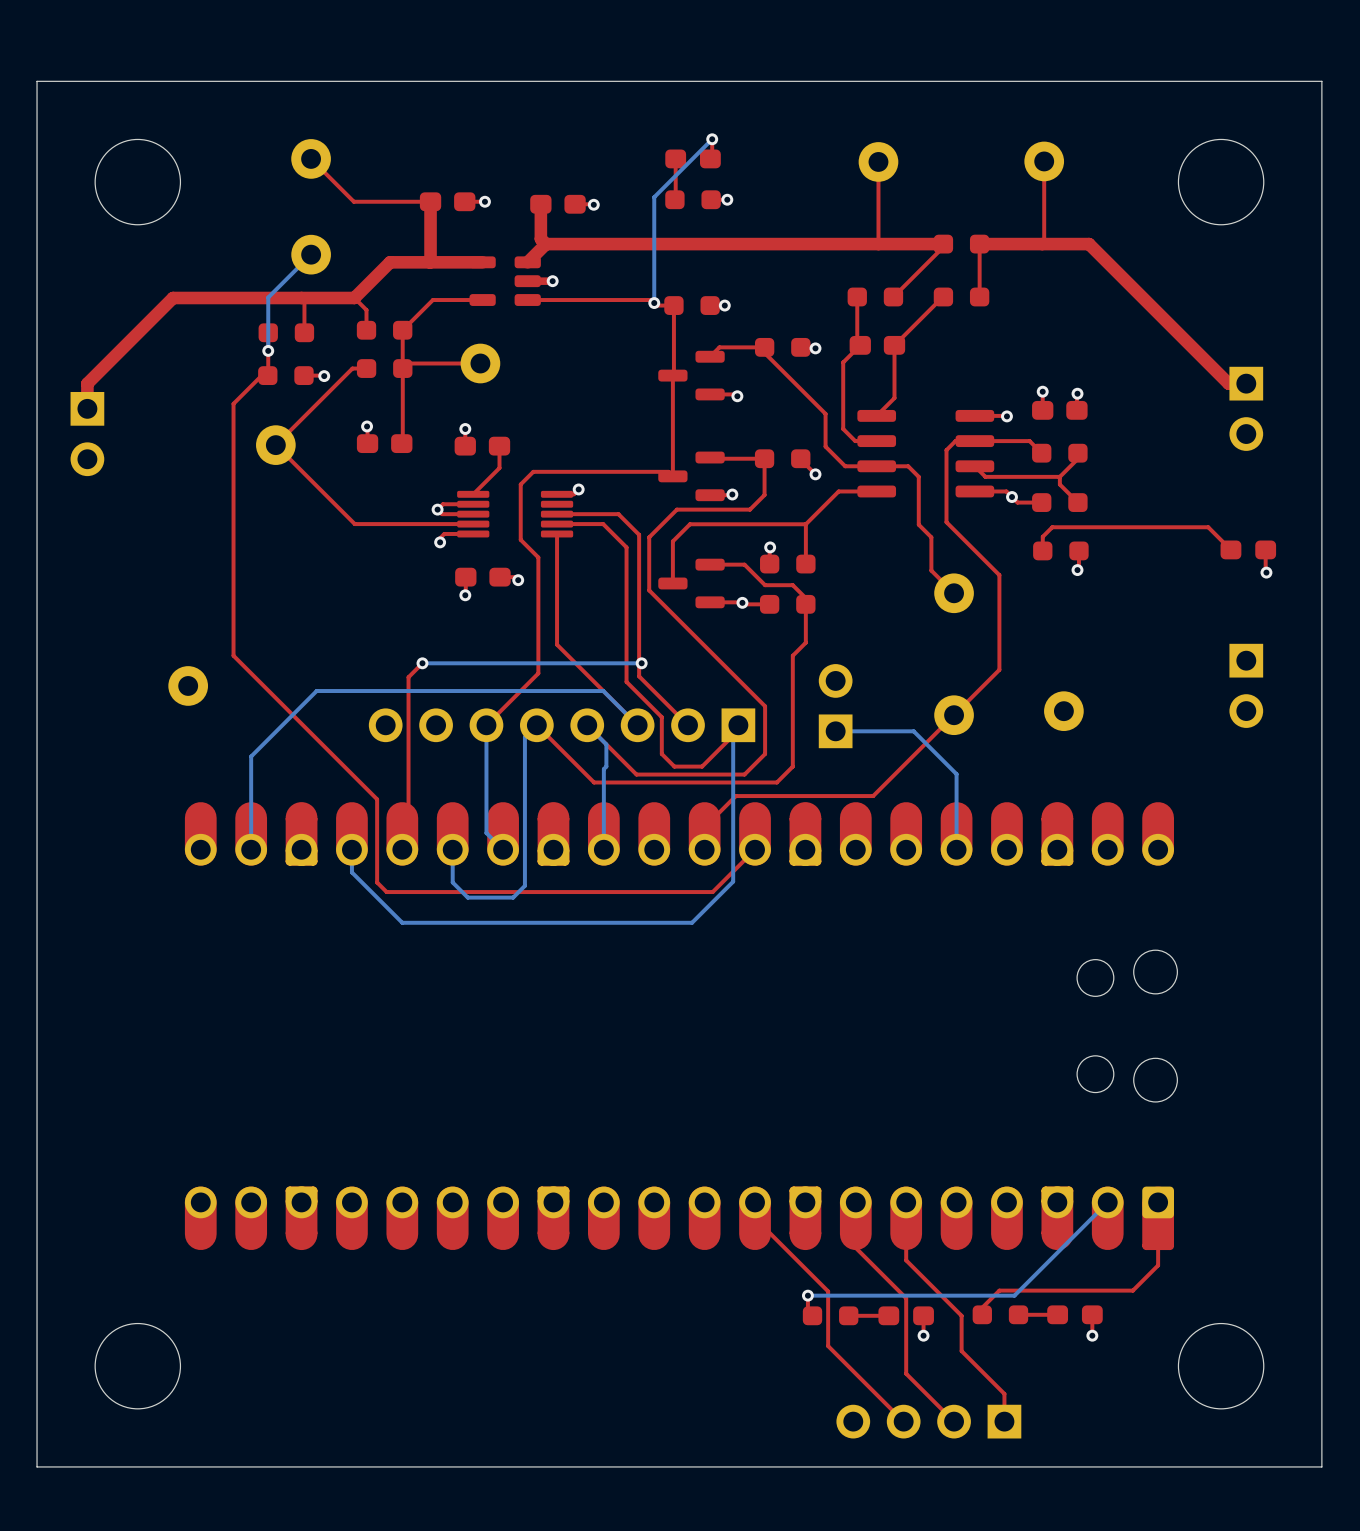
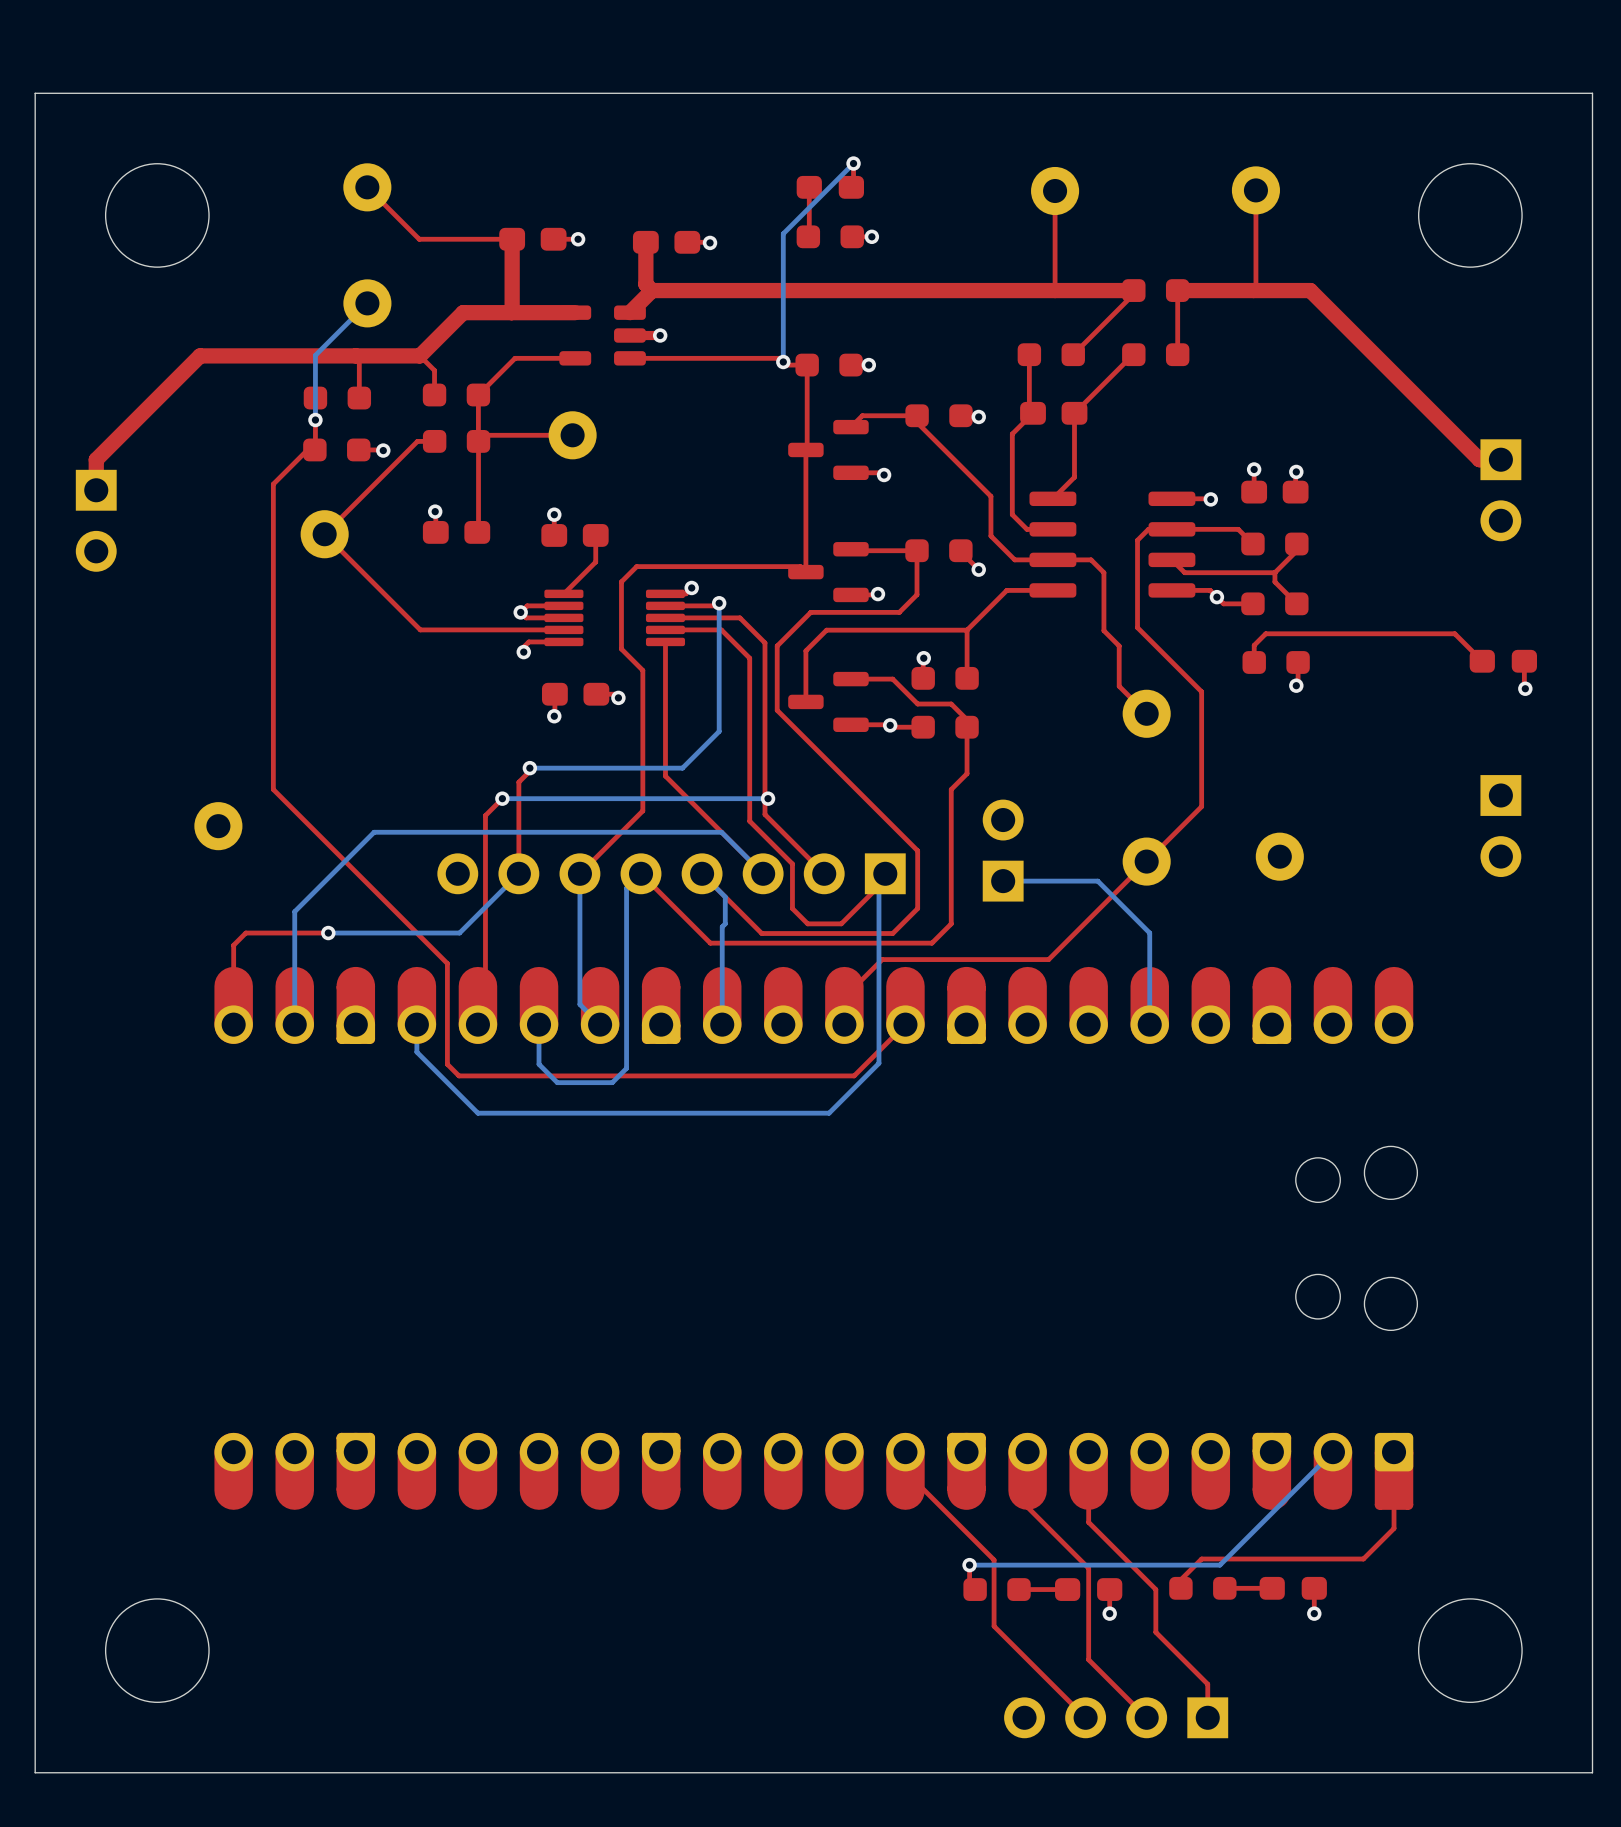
top track: none -> (719, 603) (716, 605) (665, 605)
bottom track: none -> (719, 603) (719, 731) (682, 768) (529, 768)
via: none -> (719, 603)
top track: none -> (529, 768) (529, 771) (518, 782) (518, 873)
via: none -> (529, 768)
bottom track: none -> (518, 873) (459, 933) (328, 933)
top track: none -> (328, 933) (245, 933) (233, 945) (233, 1005)
via: none -> (328, 933)

